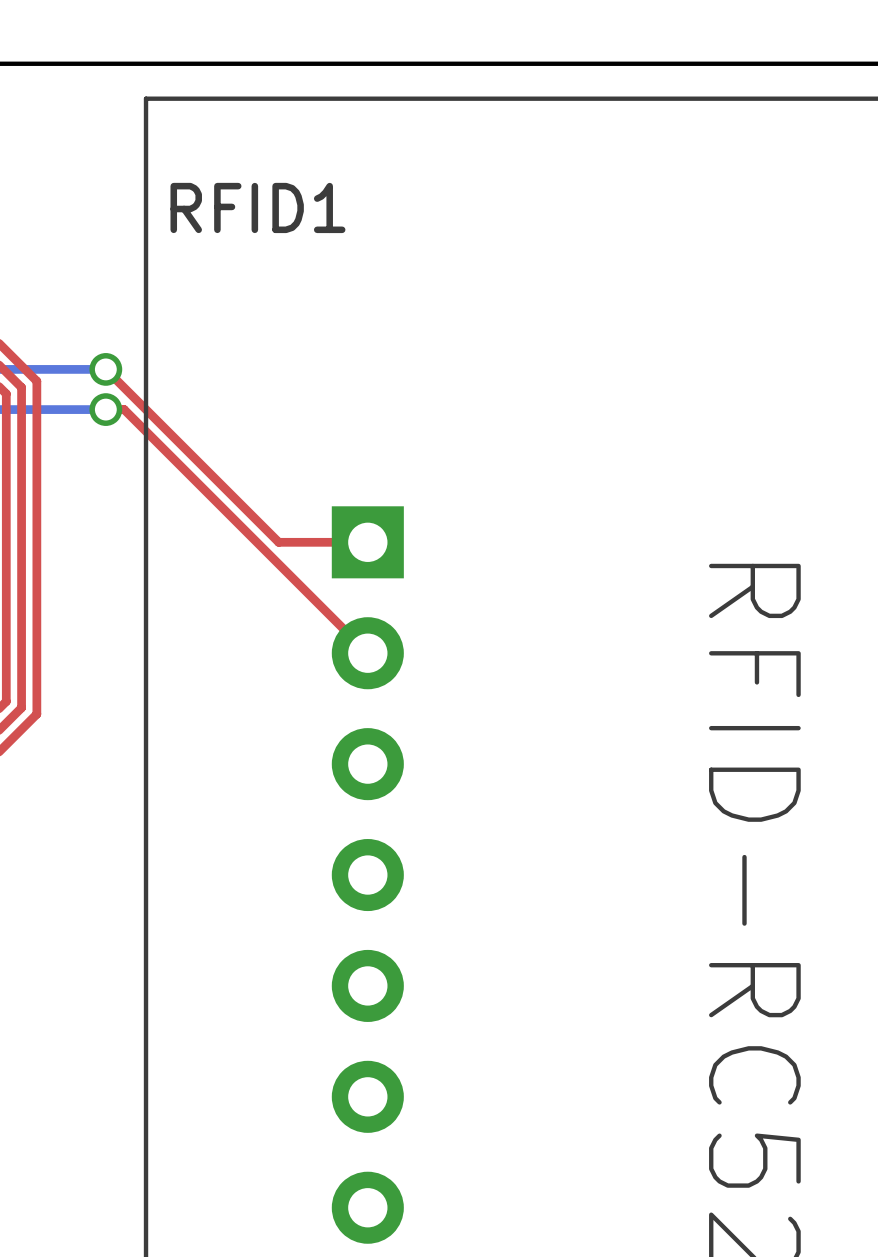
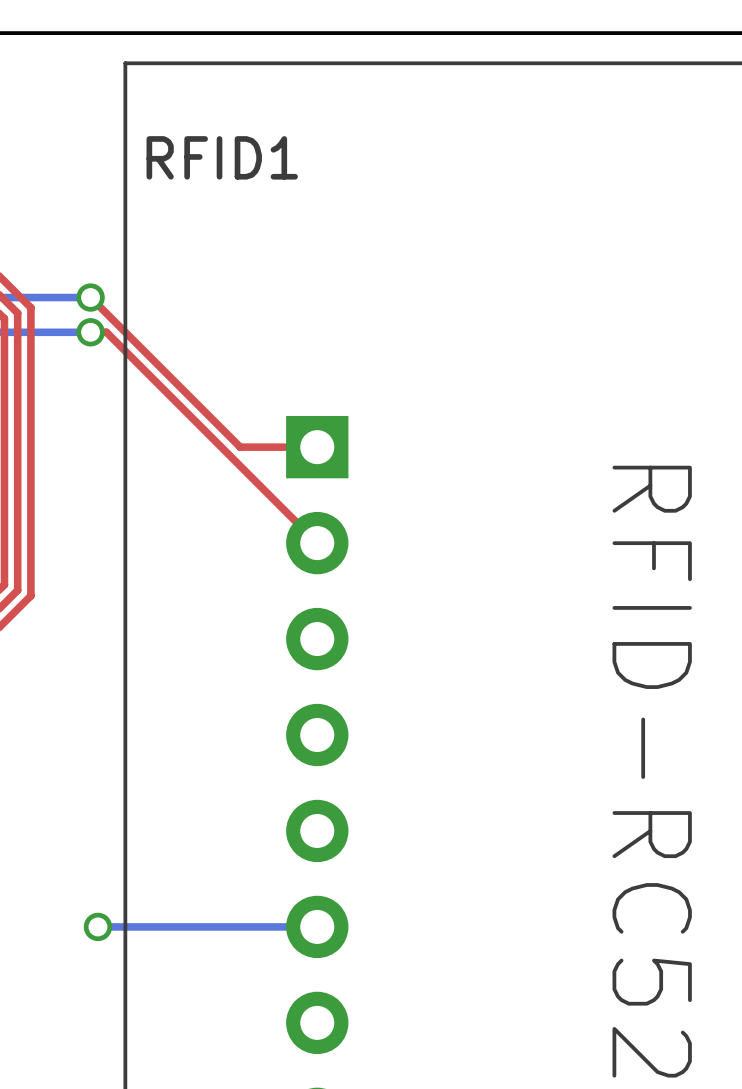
bottom track: none -> (97, 926) (317, 926)
via: none -> (97, 926)

